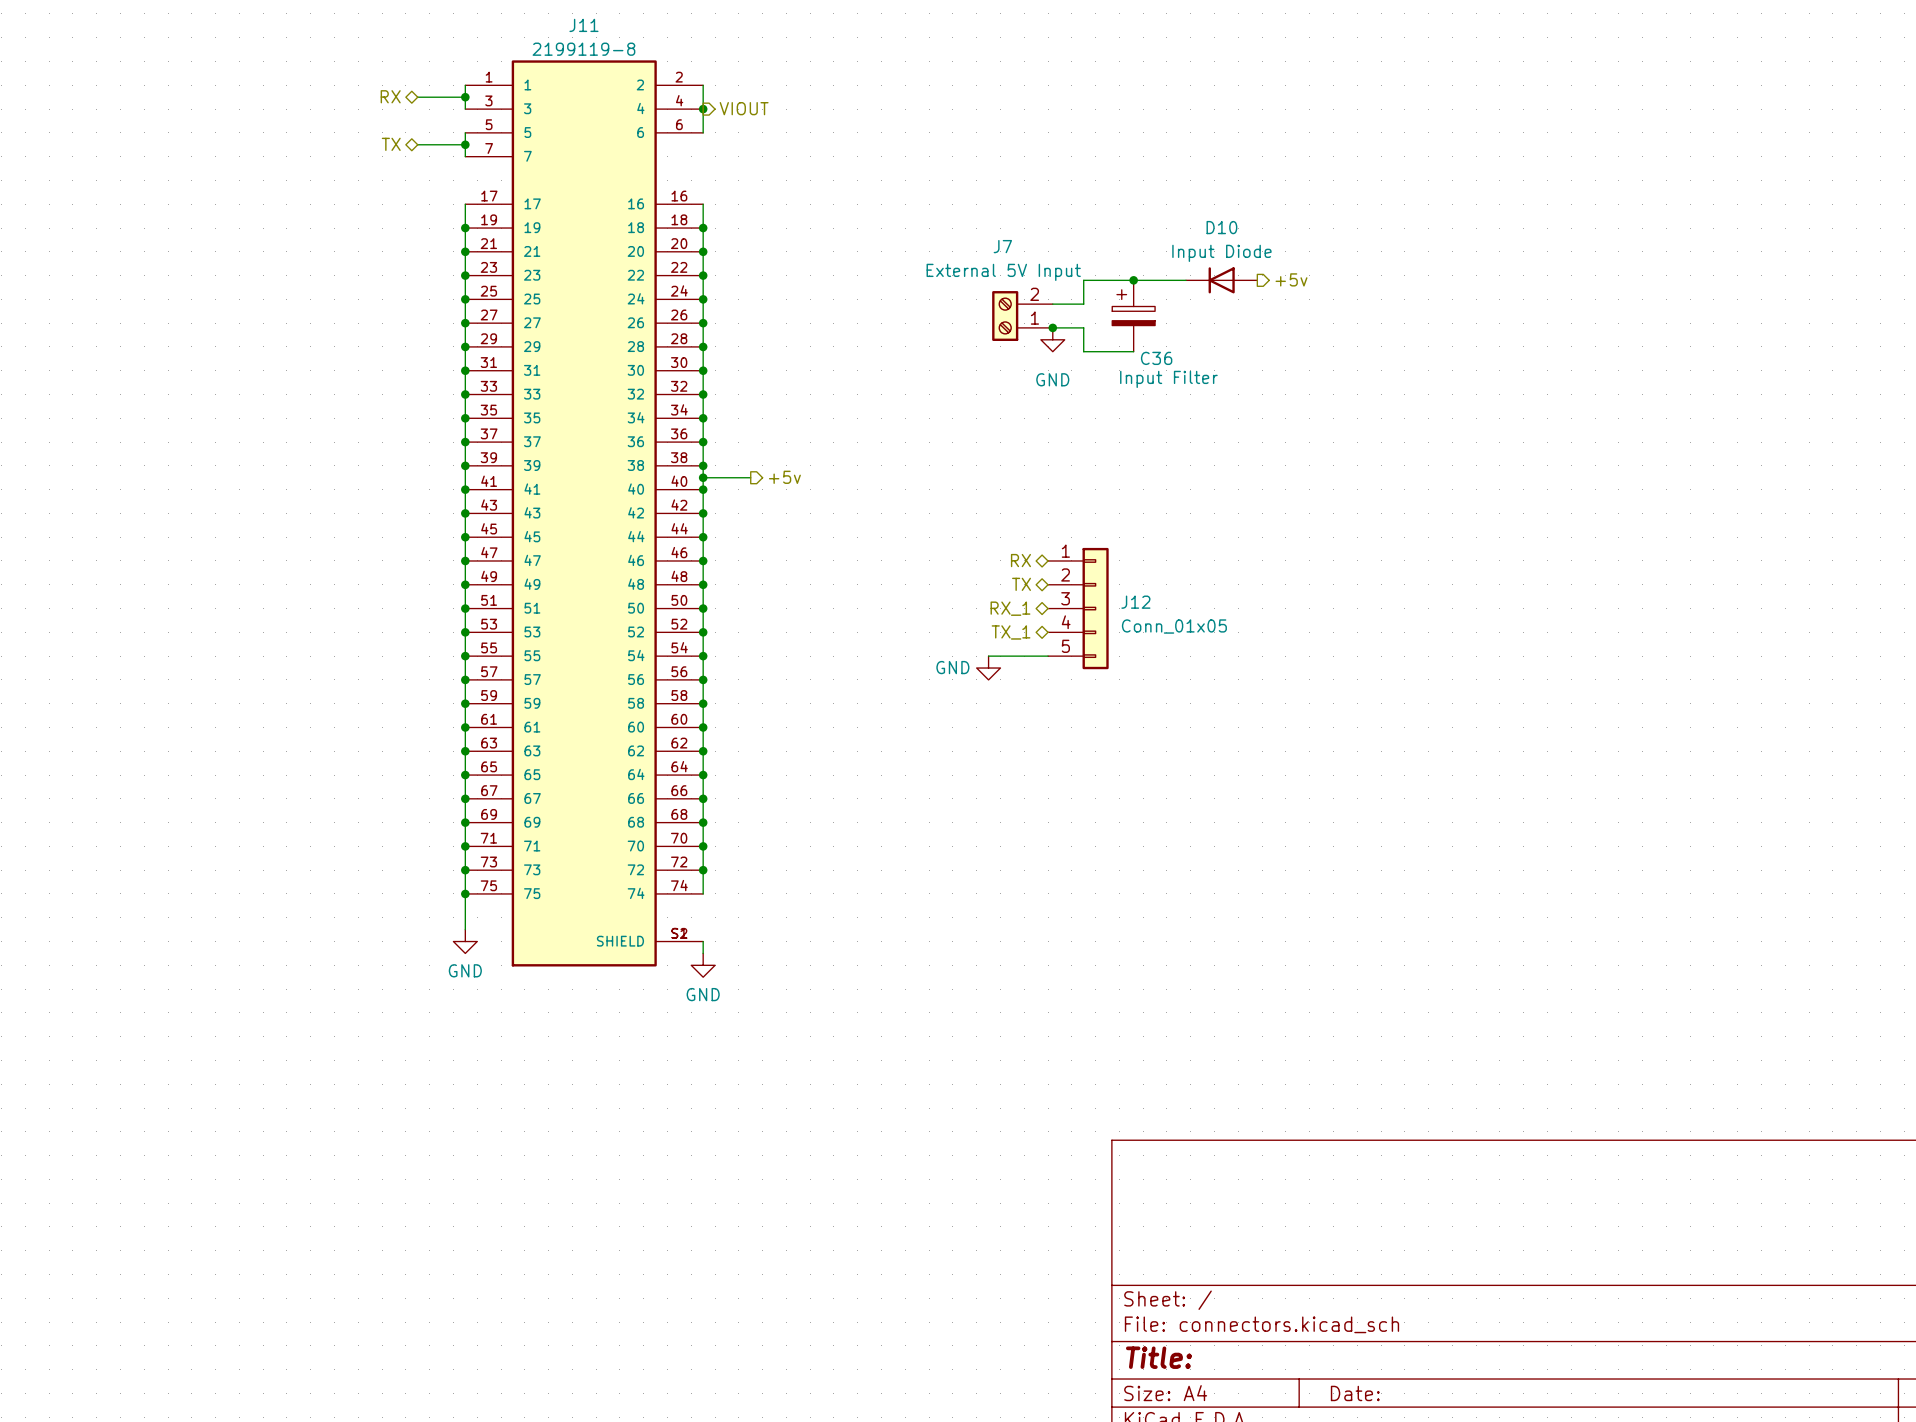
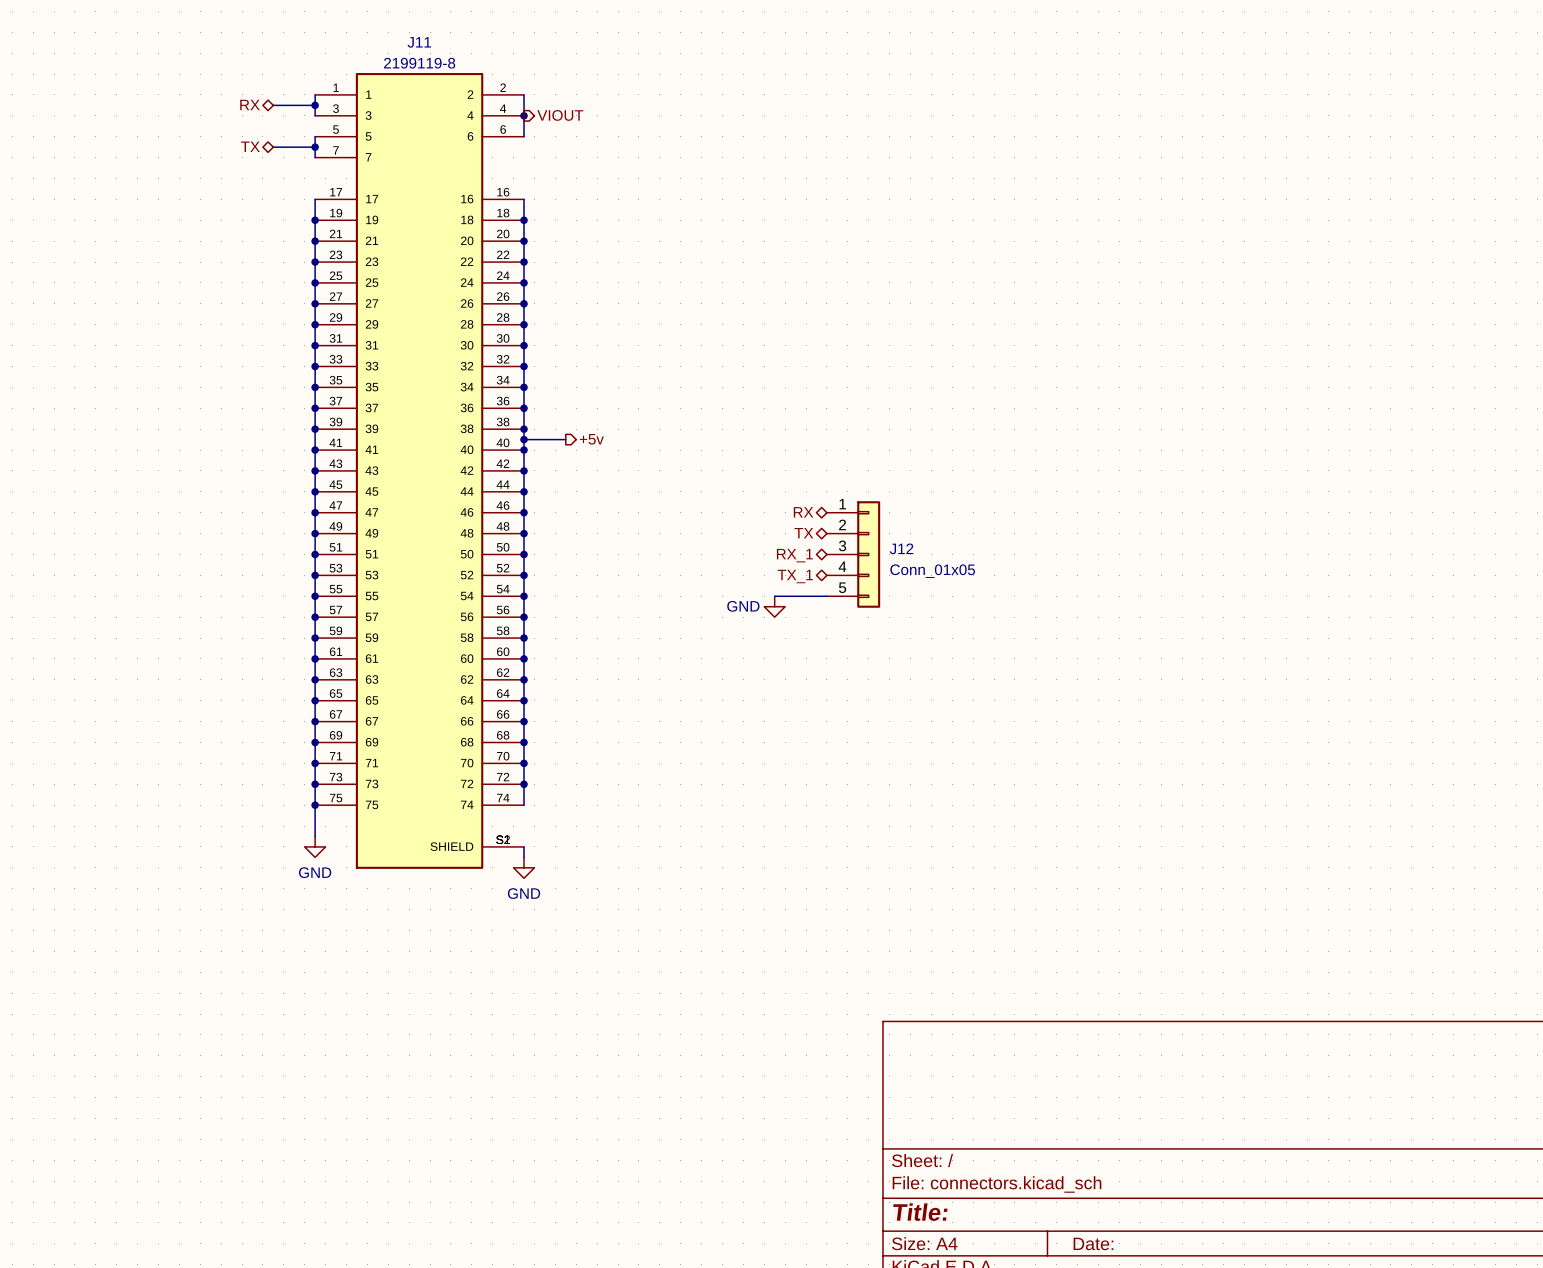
hierarchical label: +5v (1291, 279) -> none
junction: (1133, 280) -> none
wire: (1185, 280) (1083, 280) (1083, 304) (1052, 304) -> none
D10: Input Diode (1221, 280) -> none
J7: External 5V Input (1022, 316) -> none
C36: Input Filter (1133, 316) -> none
wire: (1052, 327) (1083, 327) (1083, 351) (1133, 351) -> none
junction: (1052, 327) -> none
power symbol: GND (1052, 339) -> none

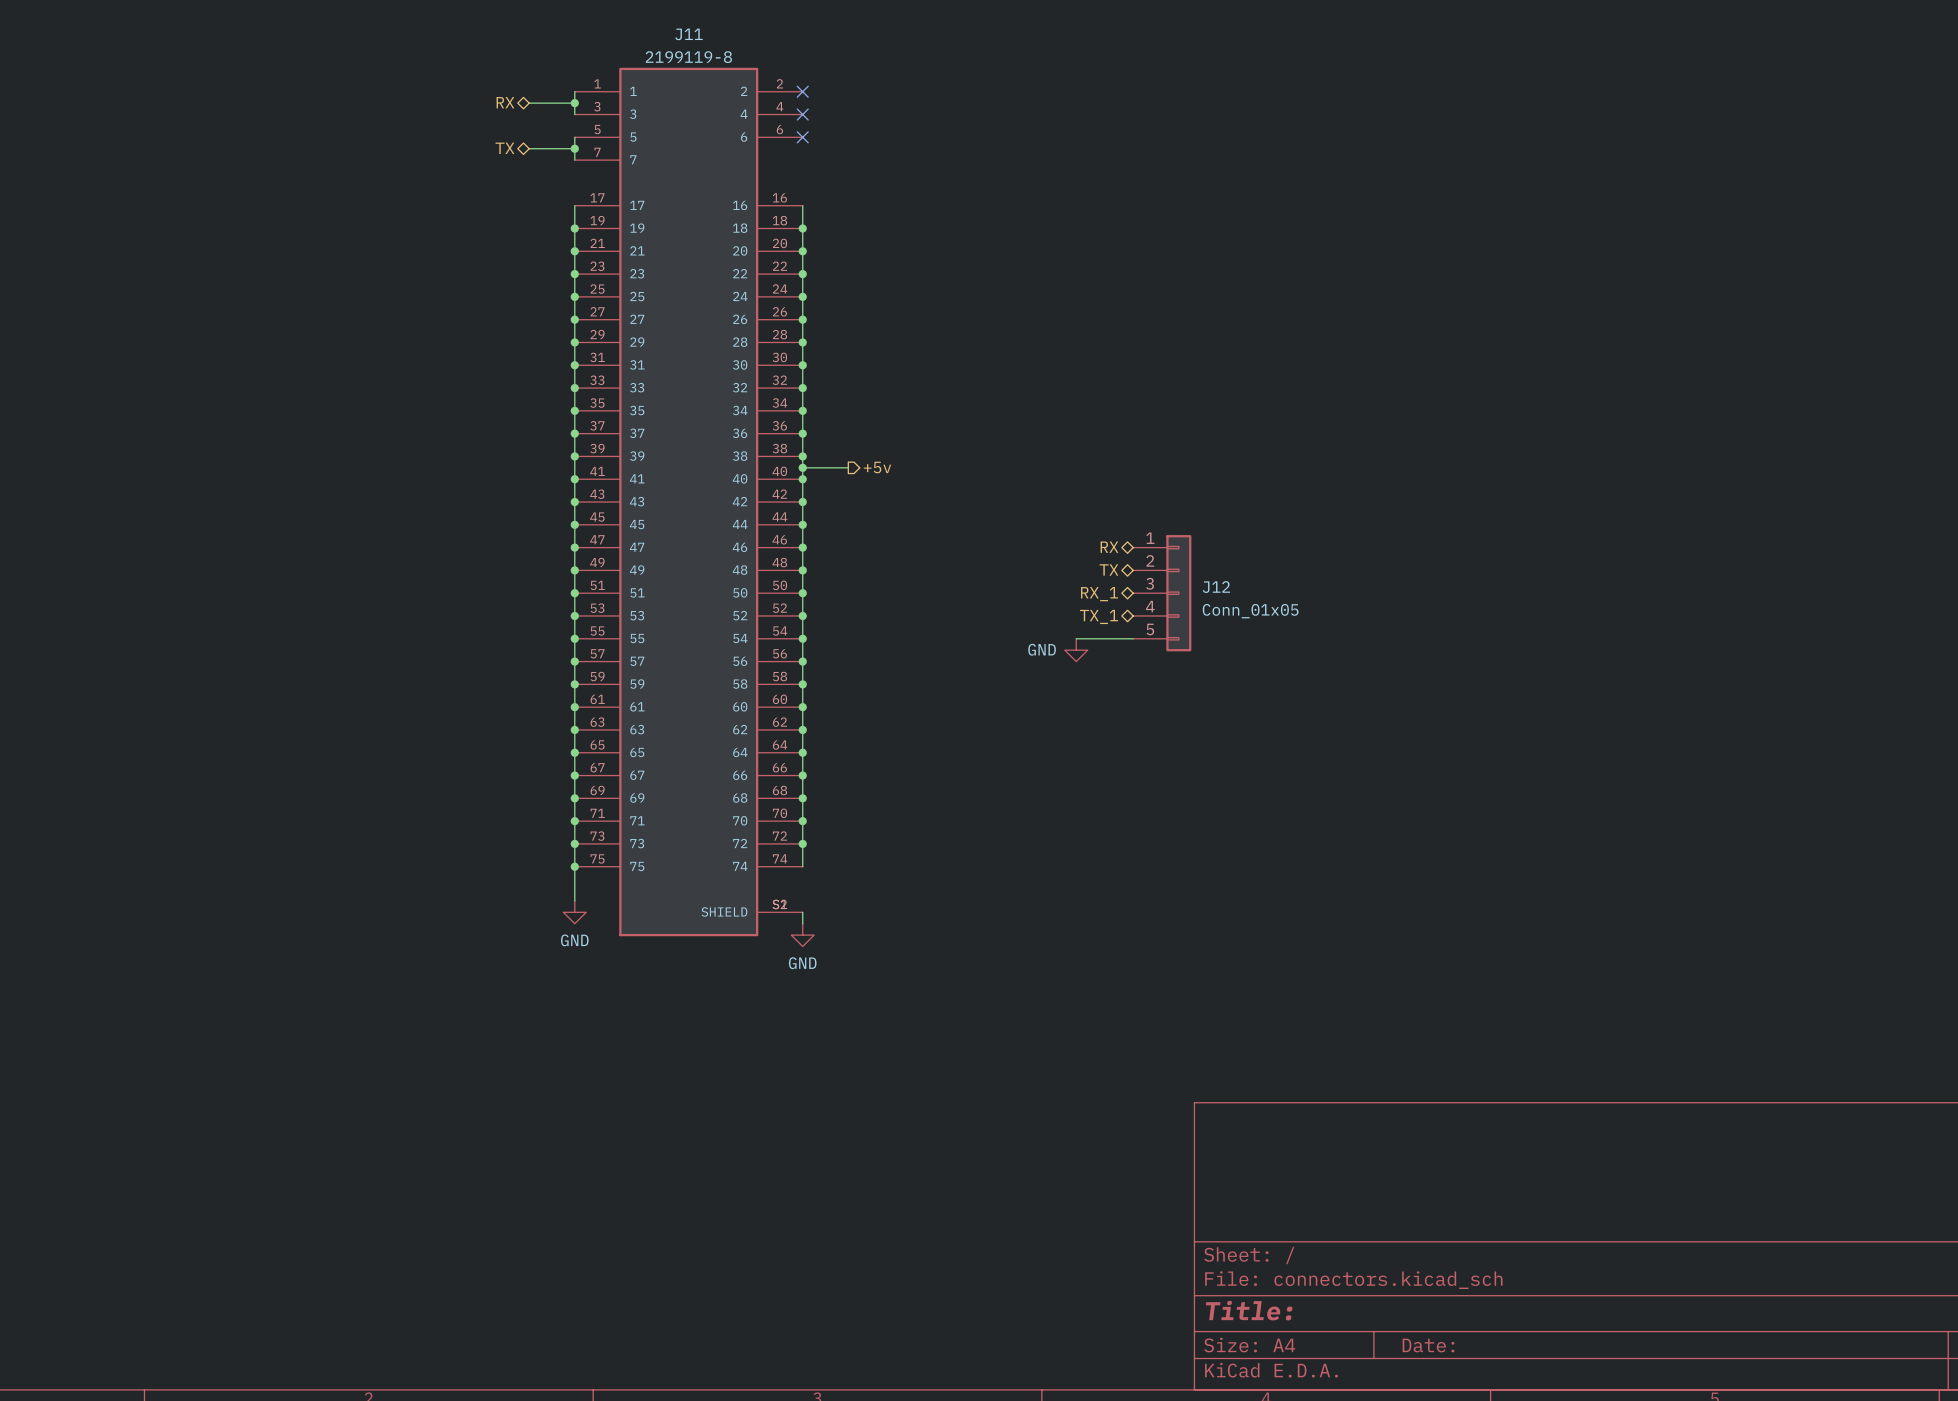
wire: (524, 94) (524, 136) -> none
no-connect mark: none -> (802, 91)
junction: (524, 115) -> none
no-connect mark: none -> (802, 114)
hierarchical label: VIOUT (560, 115) -> none
no-connect mark: none -> (802, 137)

